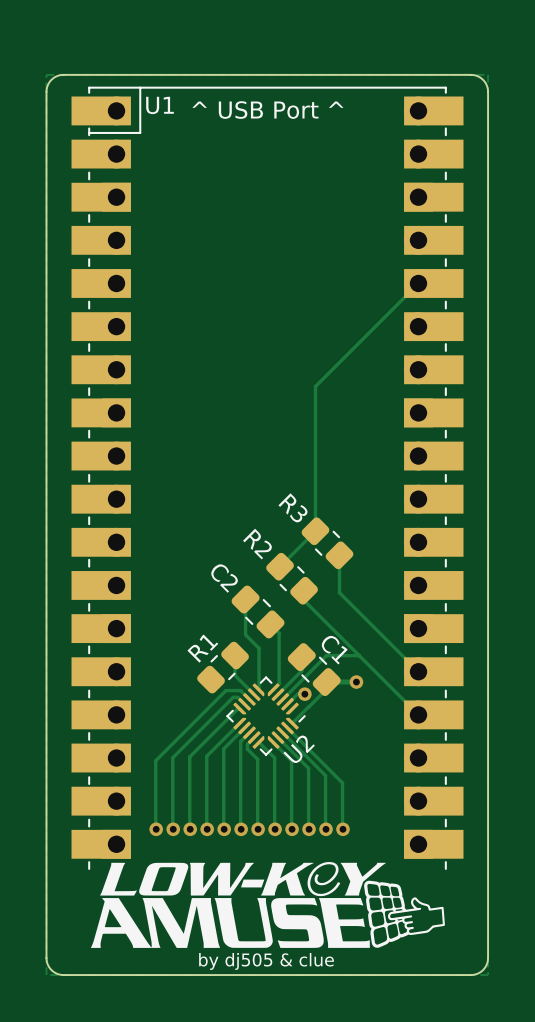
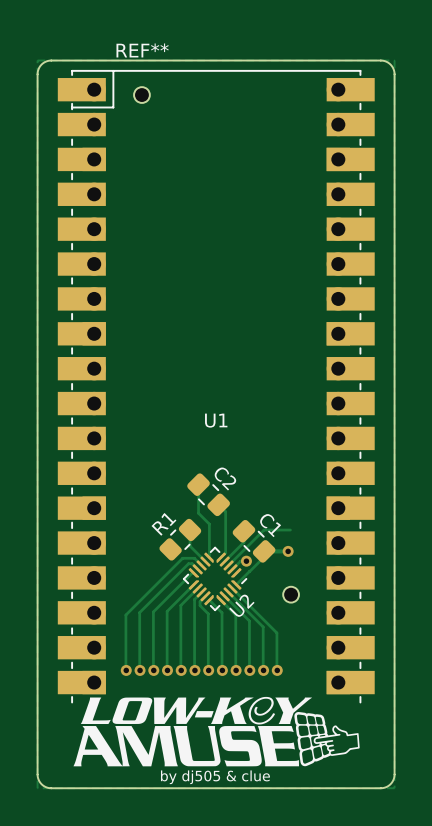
U1 name position: U1 (160, 105) -> U1 (216, 420)
text: ^ USB Port ^ (267, 110) -> none
REF**: none -> (141, 95)
track: (418, 283) (315, 386) (315, 531) (280, 566) -> none
R3: (327, 543) -> none
track: (339, 555) (339, 592) (418, 671) -> none
C2 name position: C2 (224, 578) -> C2 (225, 478)
R2: (292, 578) -> none
track: (304, 590) (304, 600) (418, 714) -> none
part: none -> (291, 594)

